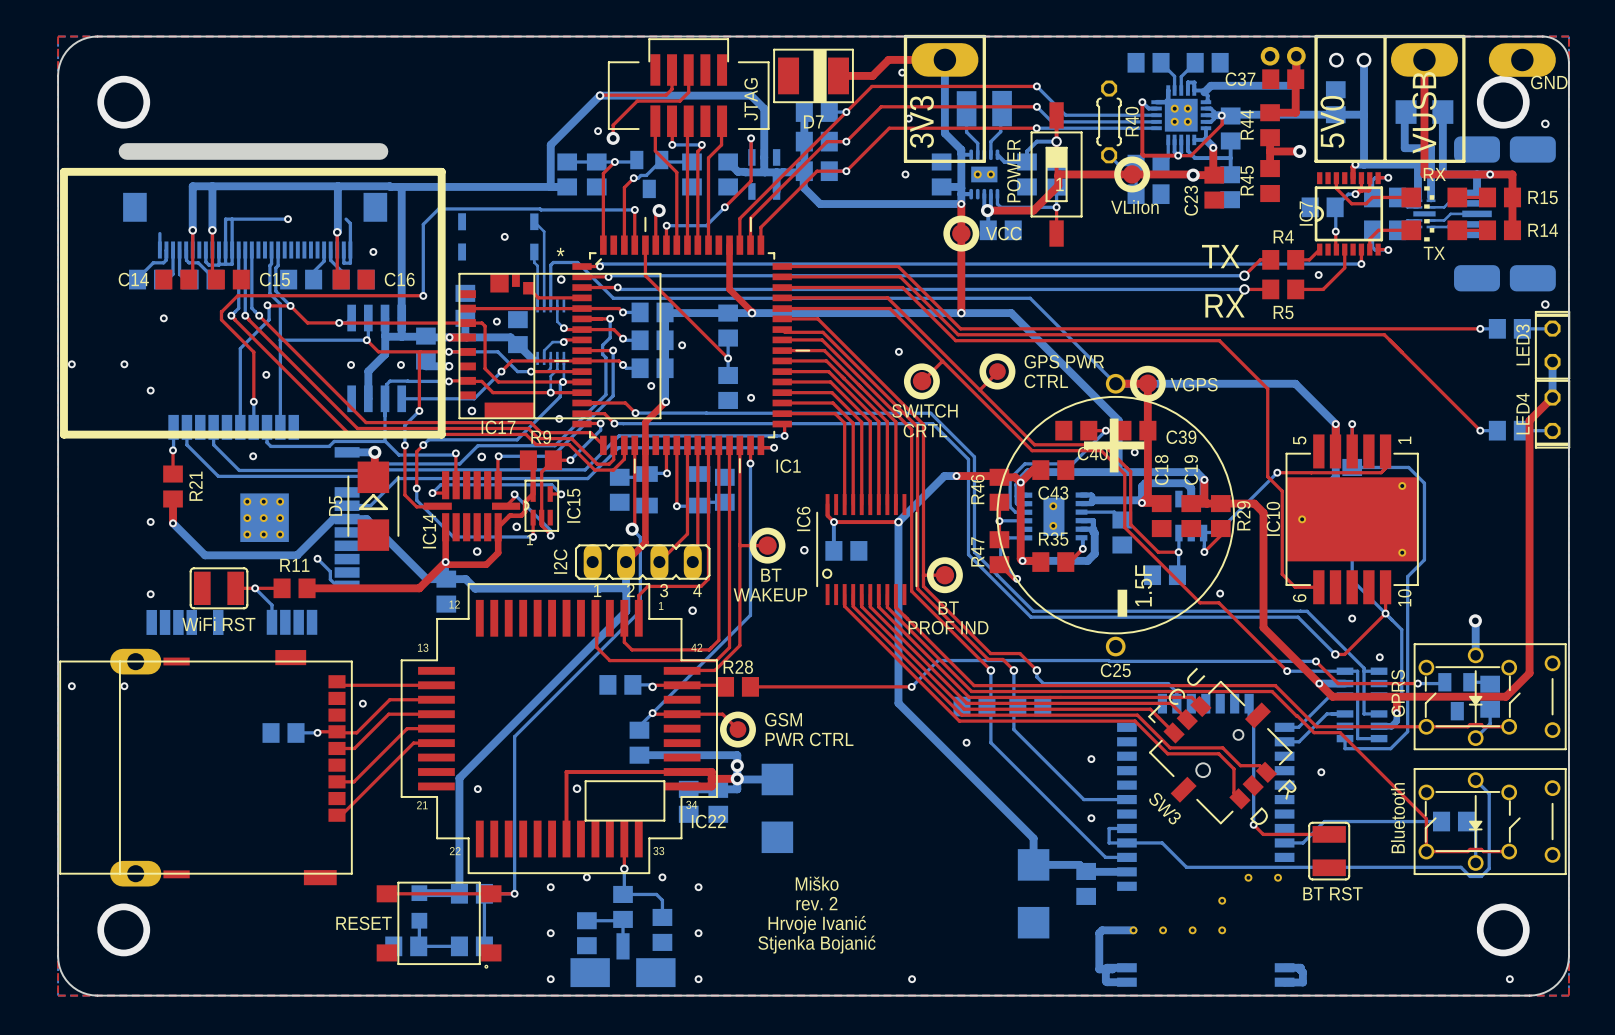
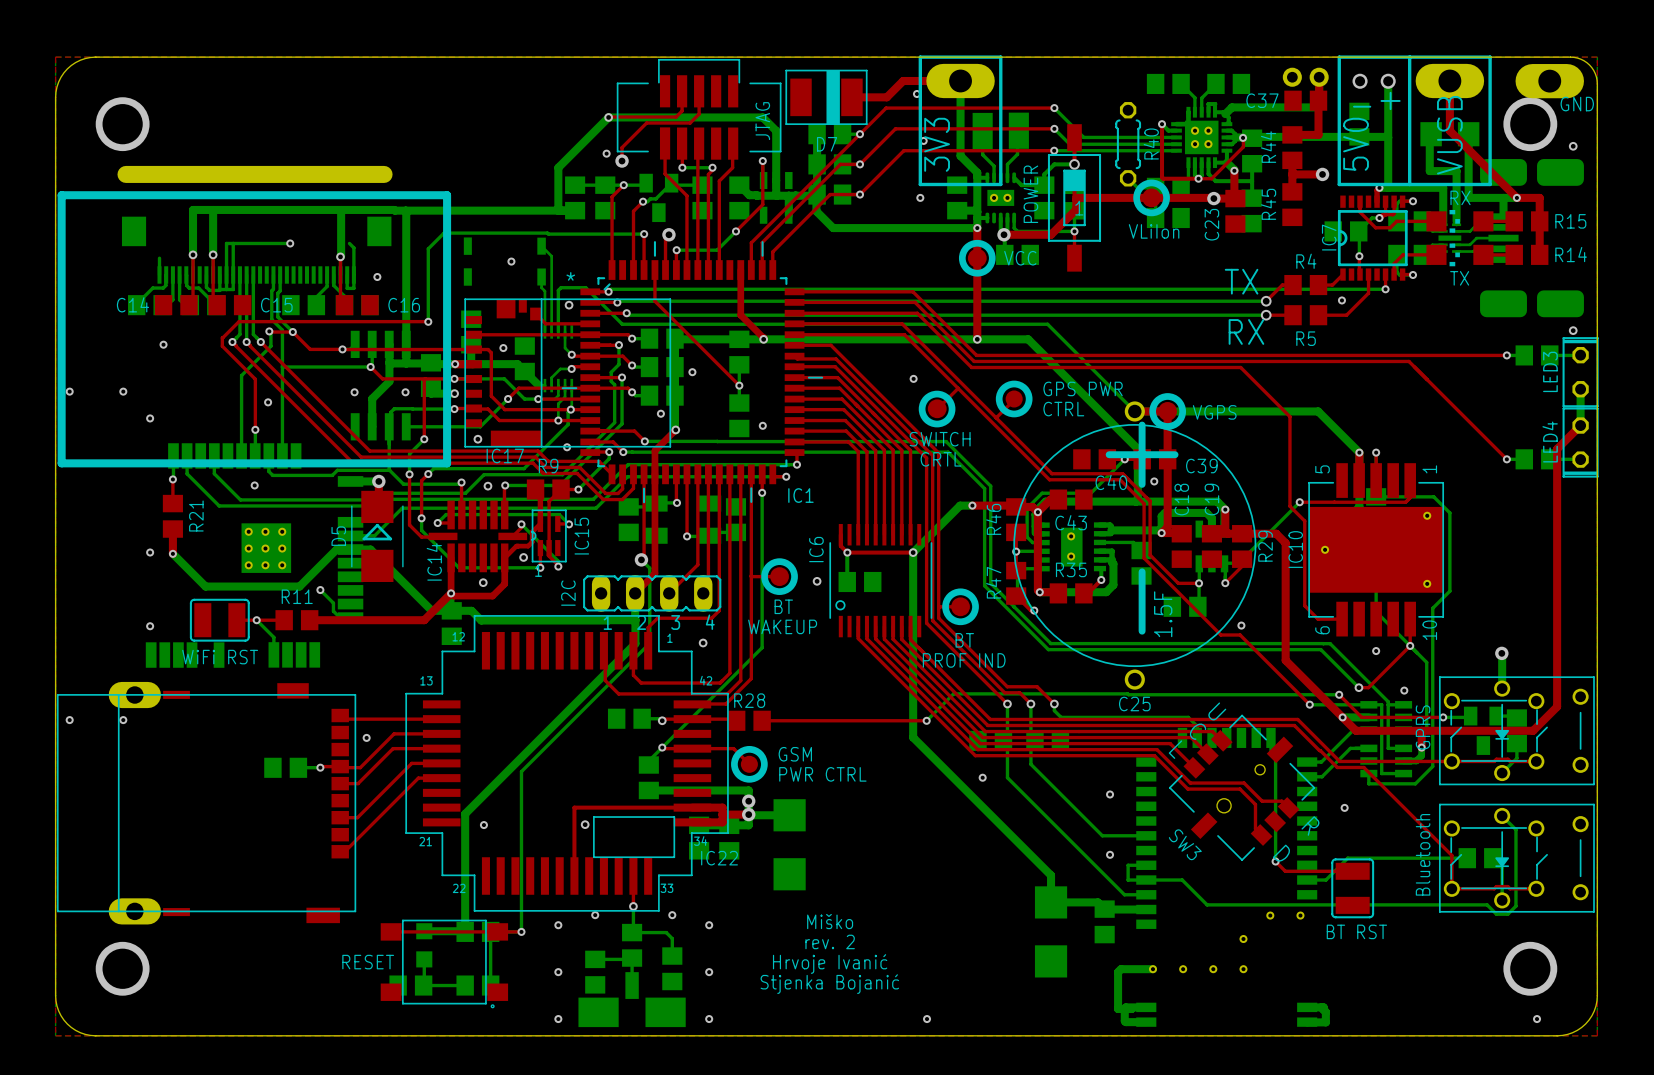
text: none -> + (1390, 100)
text: none -> - (1362, 106)
top track: (1424, 108) (1424, 174) (1490, 174) -> (1449, 130) (1516, 197)

